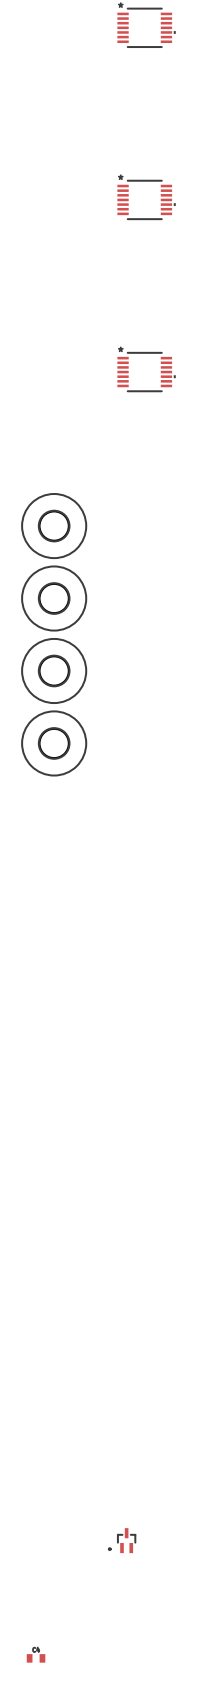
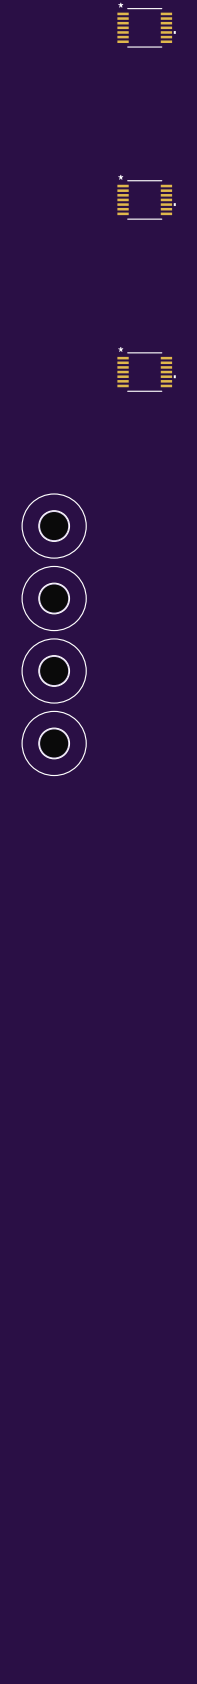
part: (122, 1540) -> none
part: (36, 1658) -> none

